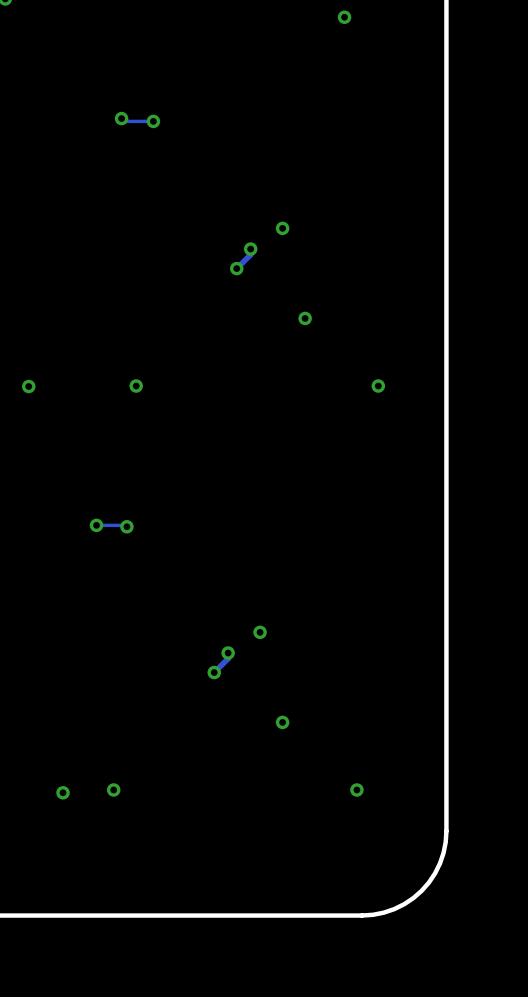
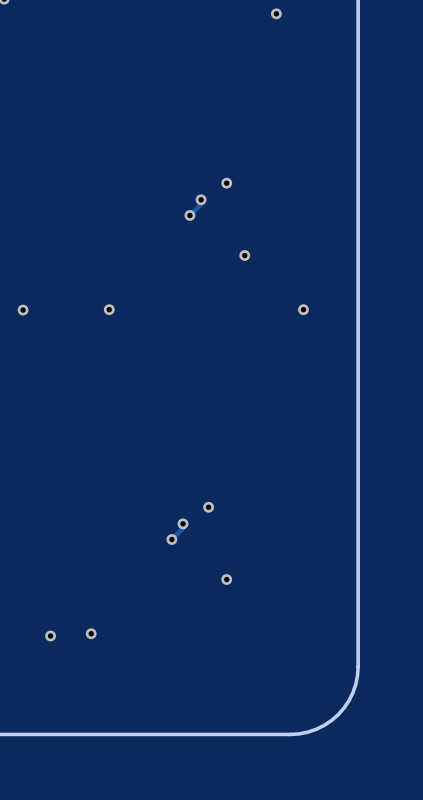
track: (121, 118) (124, 121) (153, 121) -> none
via: (121, 118) -> none
via: (153, 121) -> none
track: (96, 525) (126, 526) -> none
via: (96, 525) -> none
via: (126, 526) -> none
via: (356, 789) -> none

